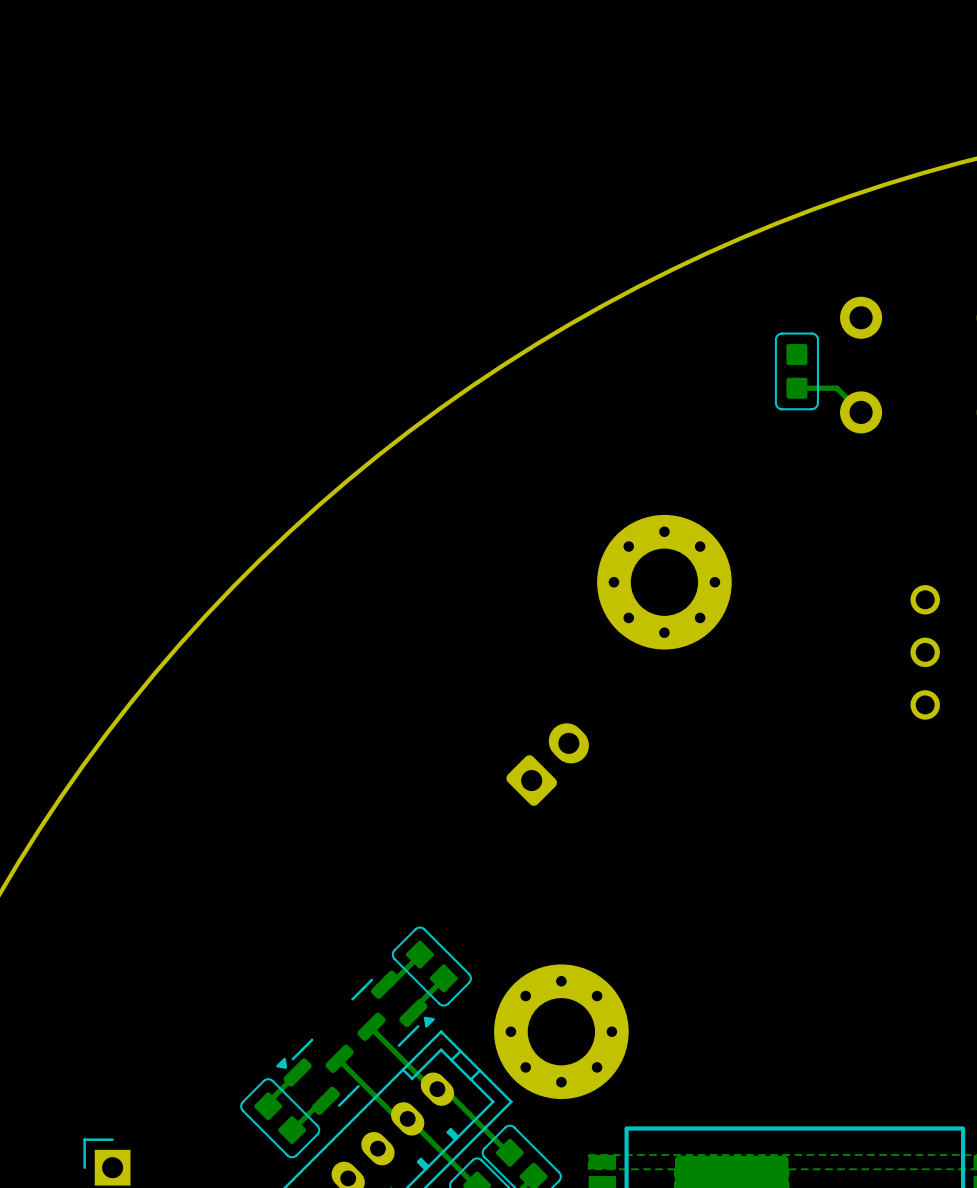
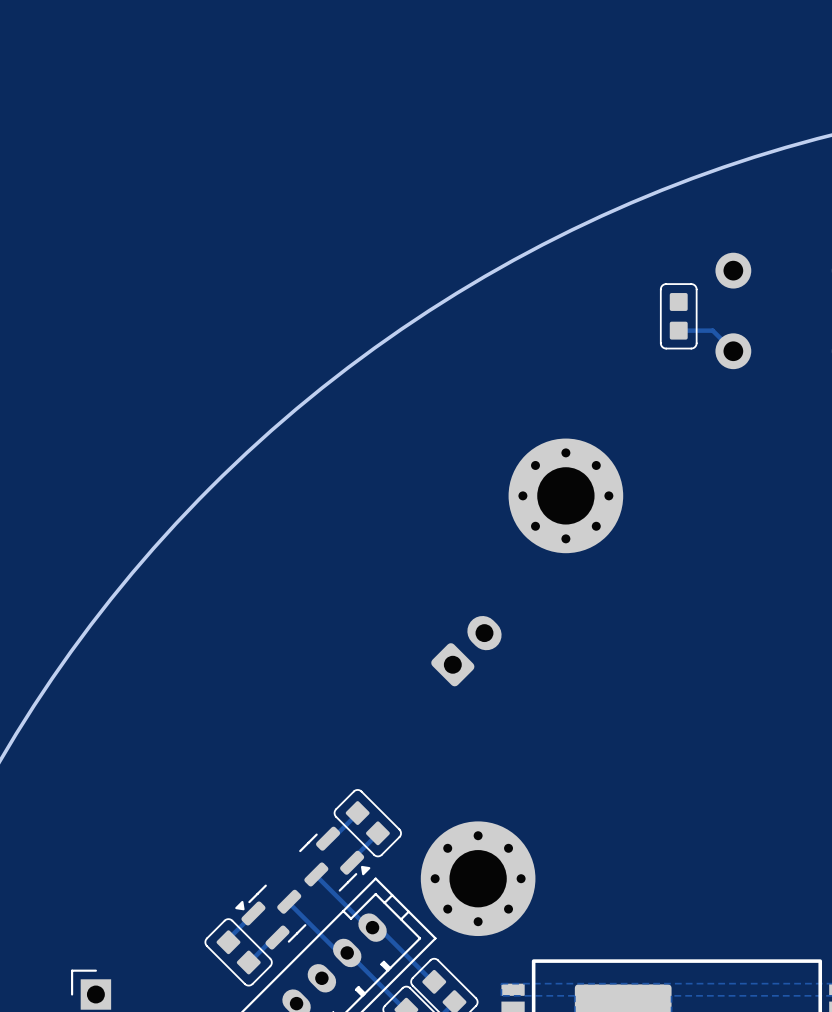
part: (925, 652) -> none

